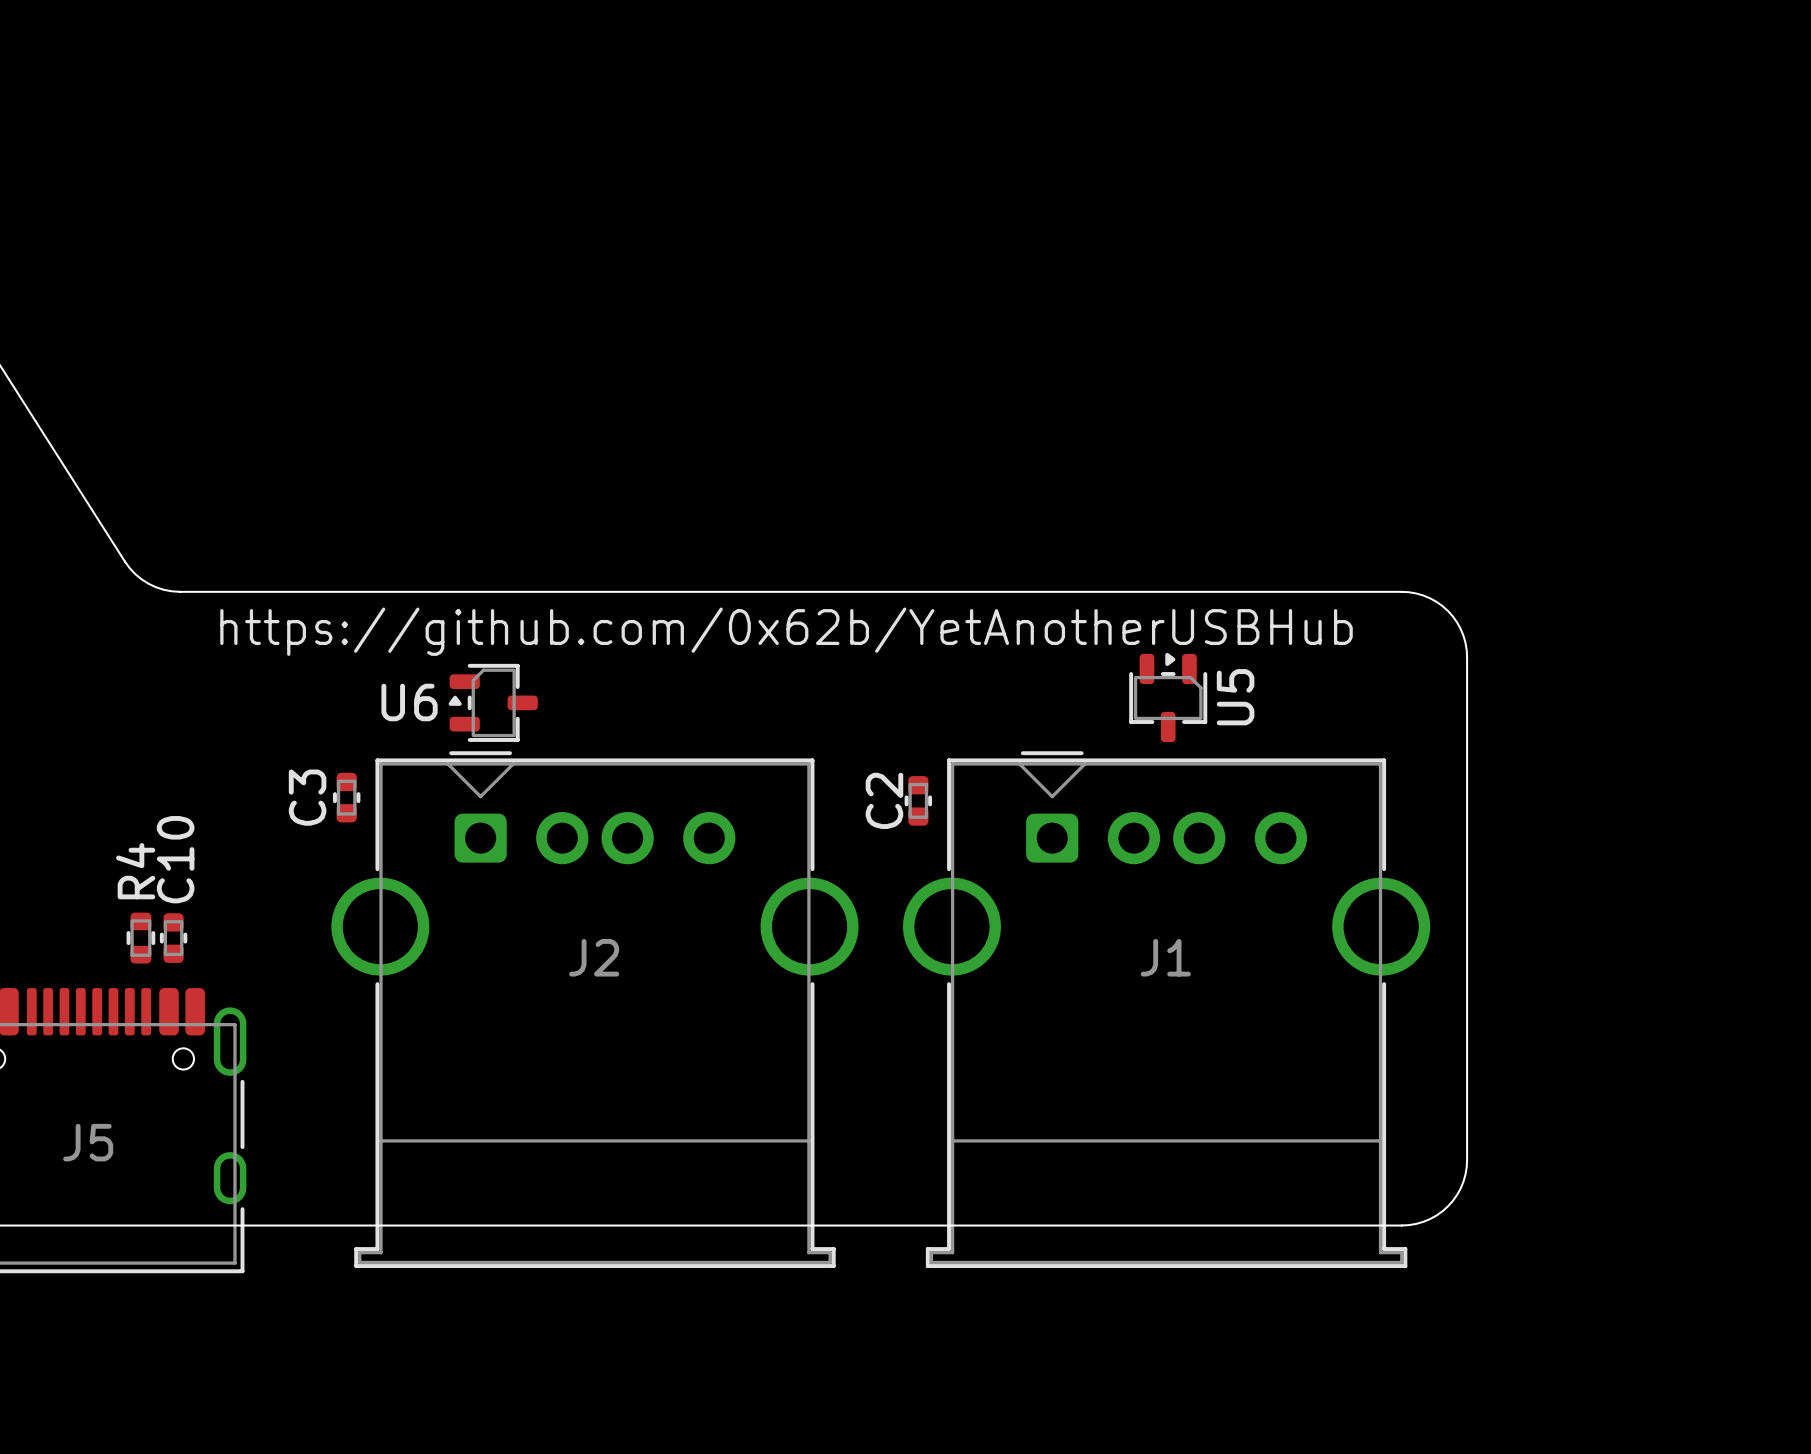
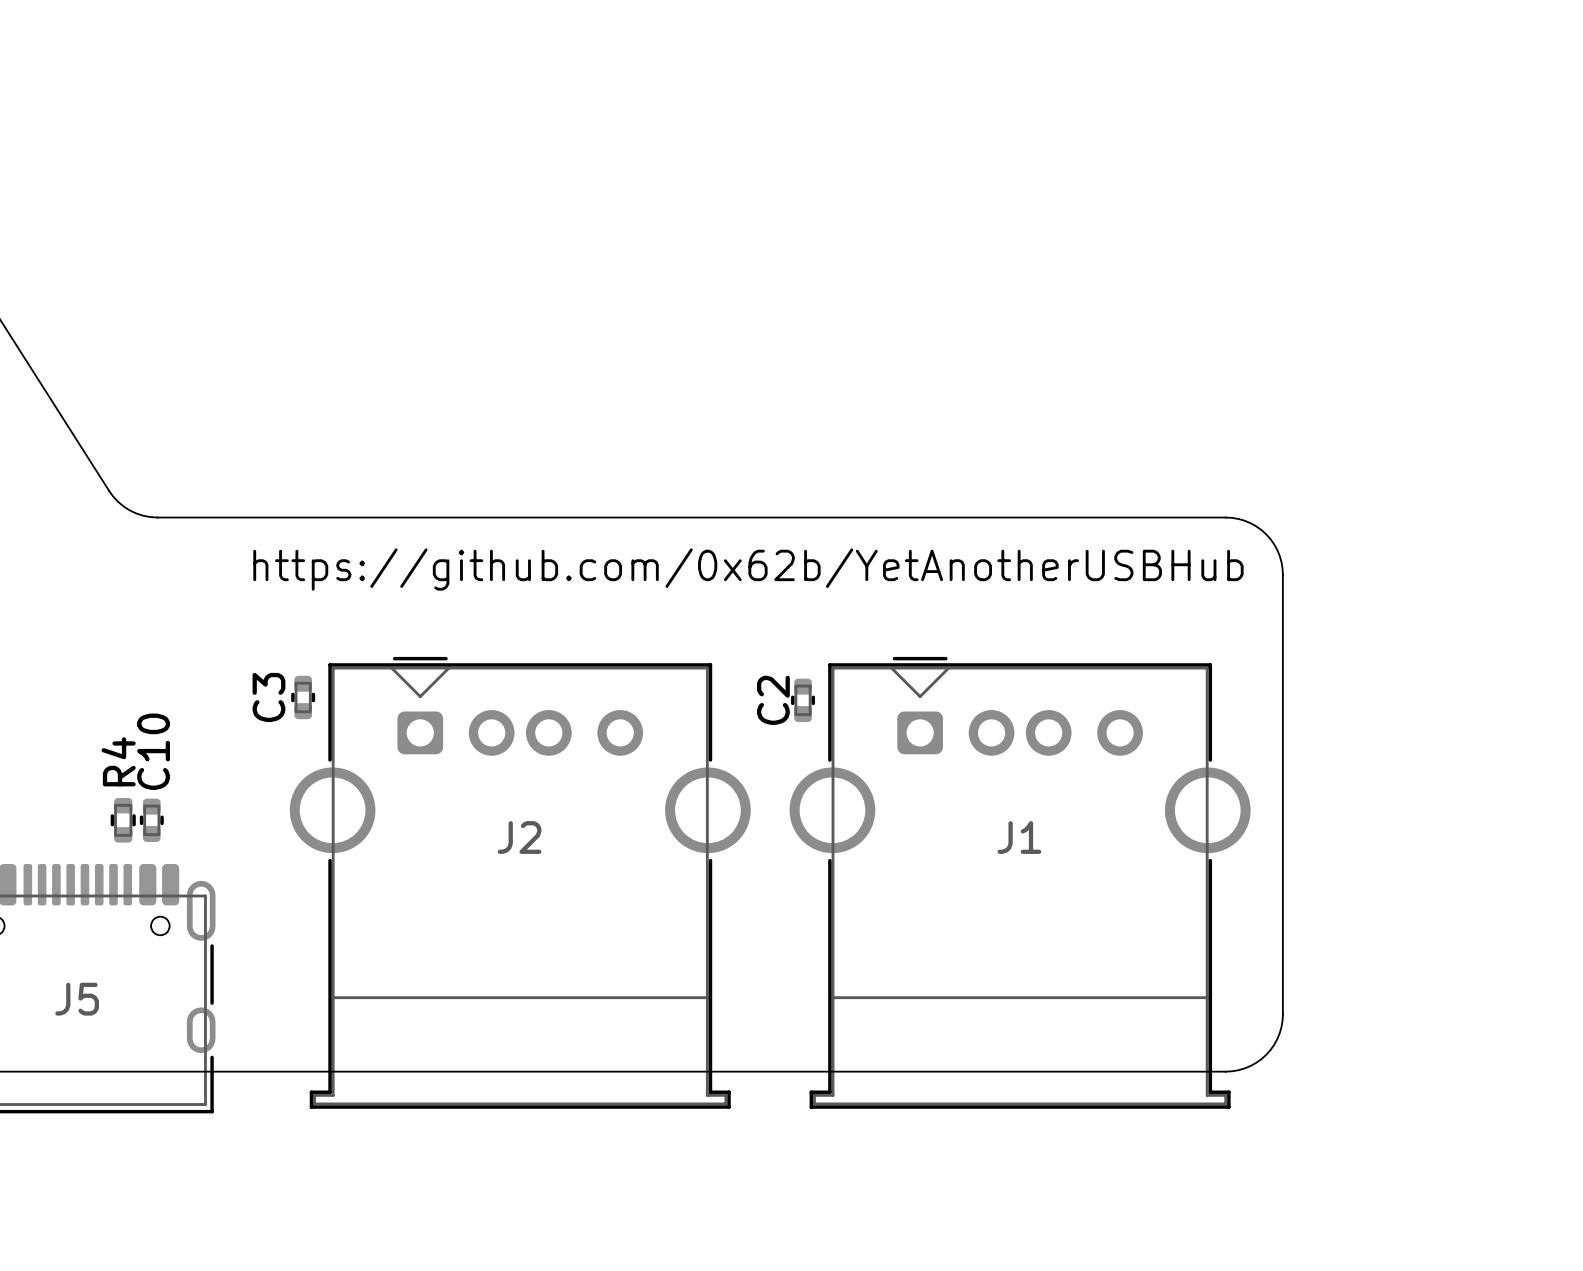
text position: https://github.com/0x62b/YetAnotherUSBHub (786, 631) -> https://github.com/0x62b/YetAnotherUSBHub (748, 569)
U5: (1168, 697) -> none
U6: (493, 702) -> none

